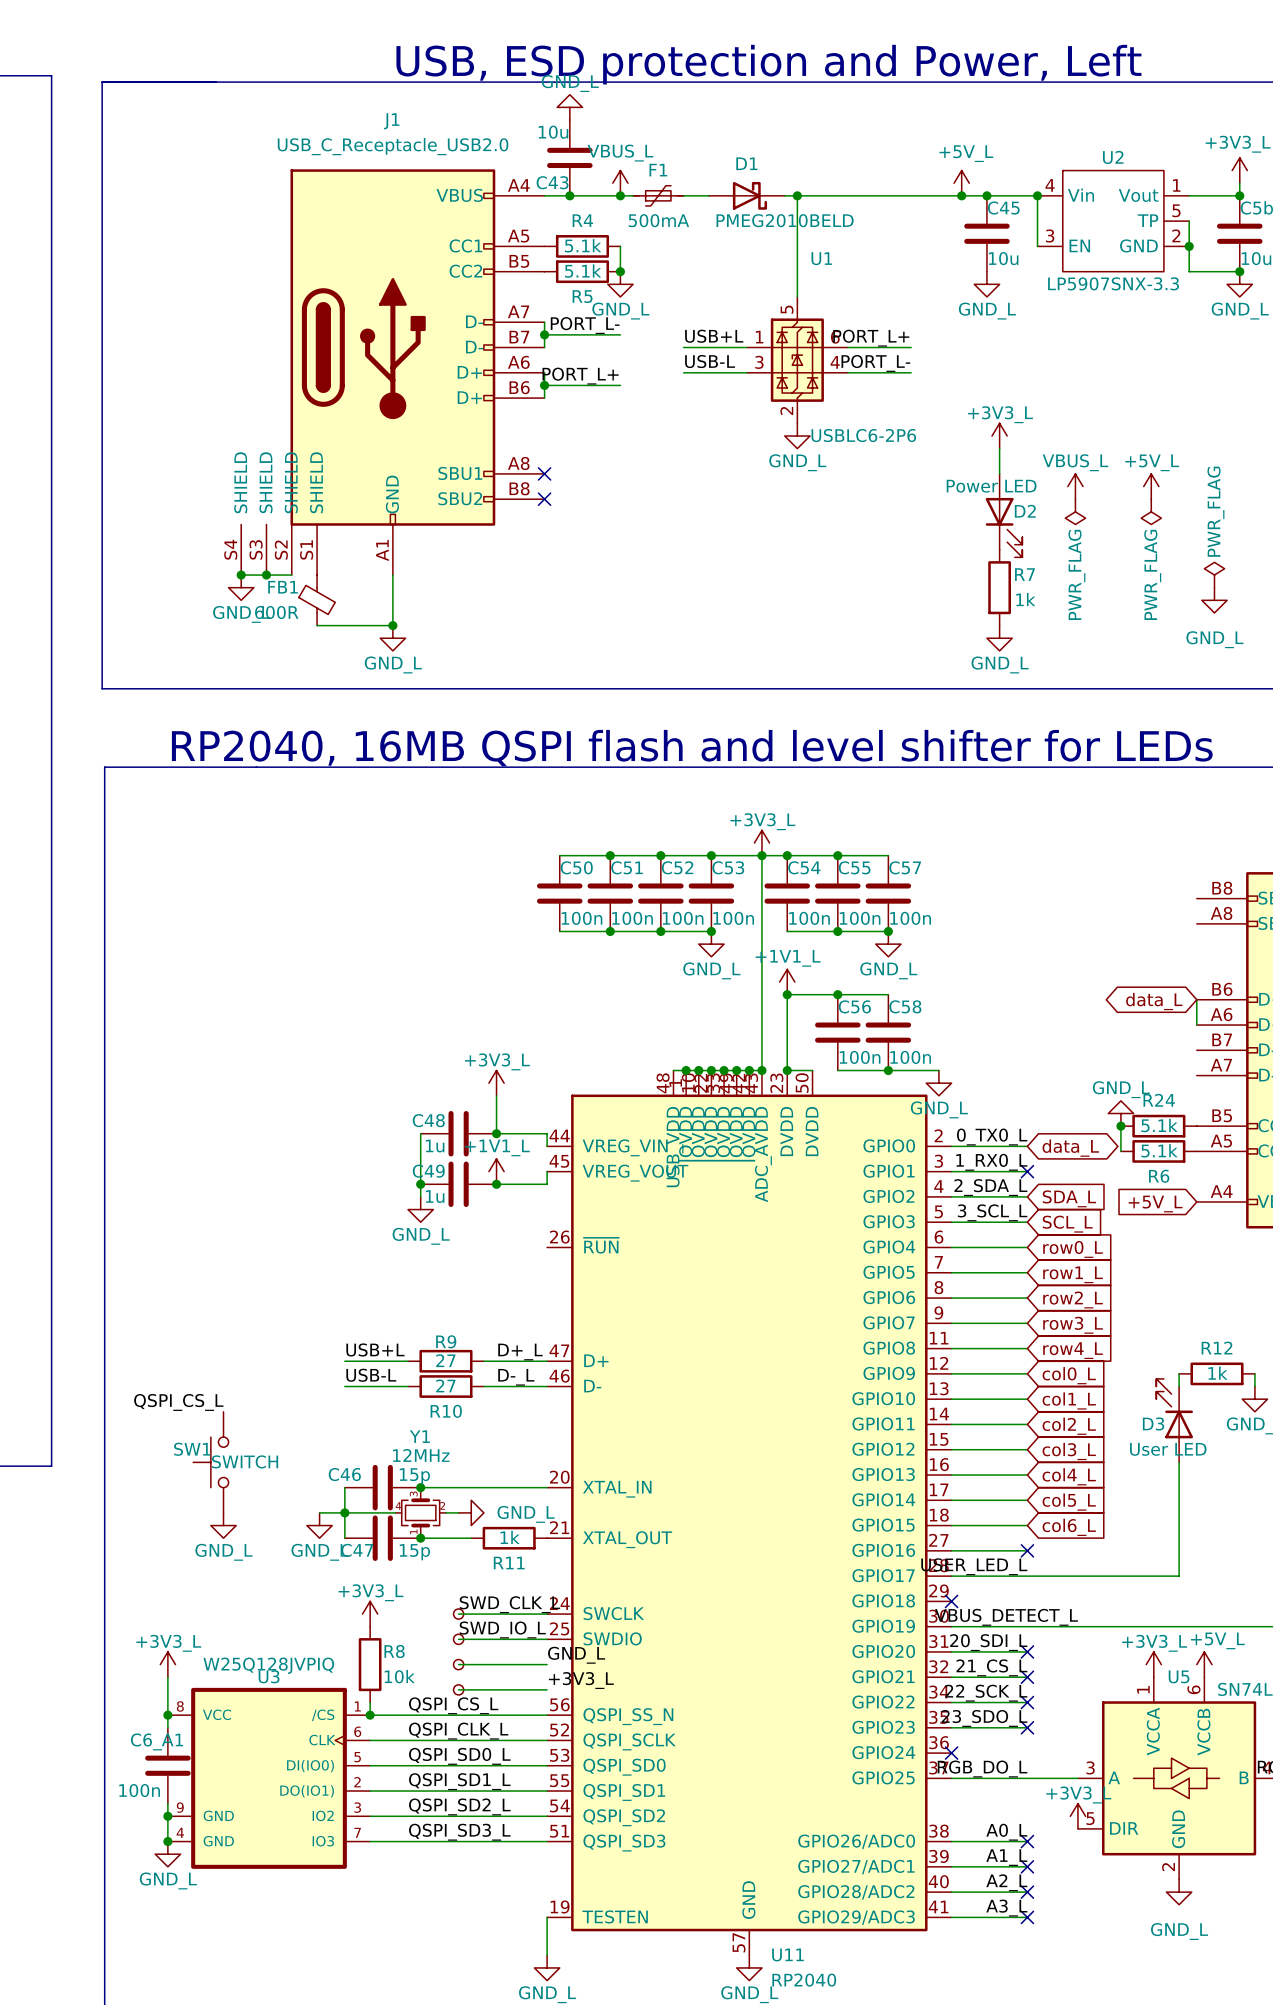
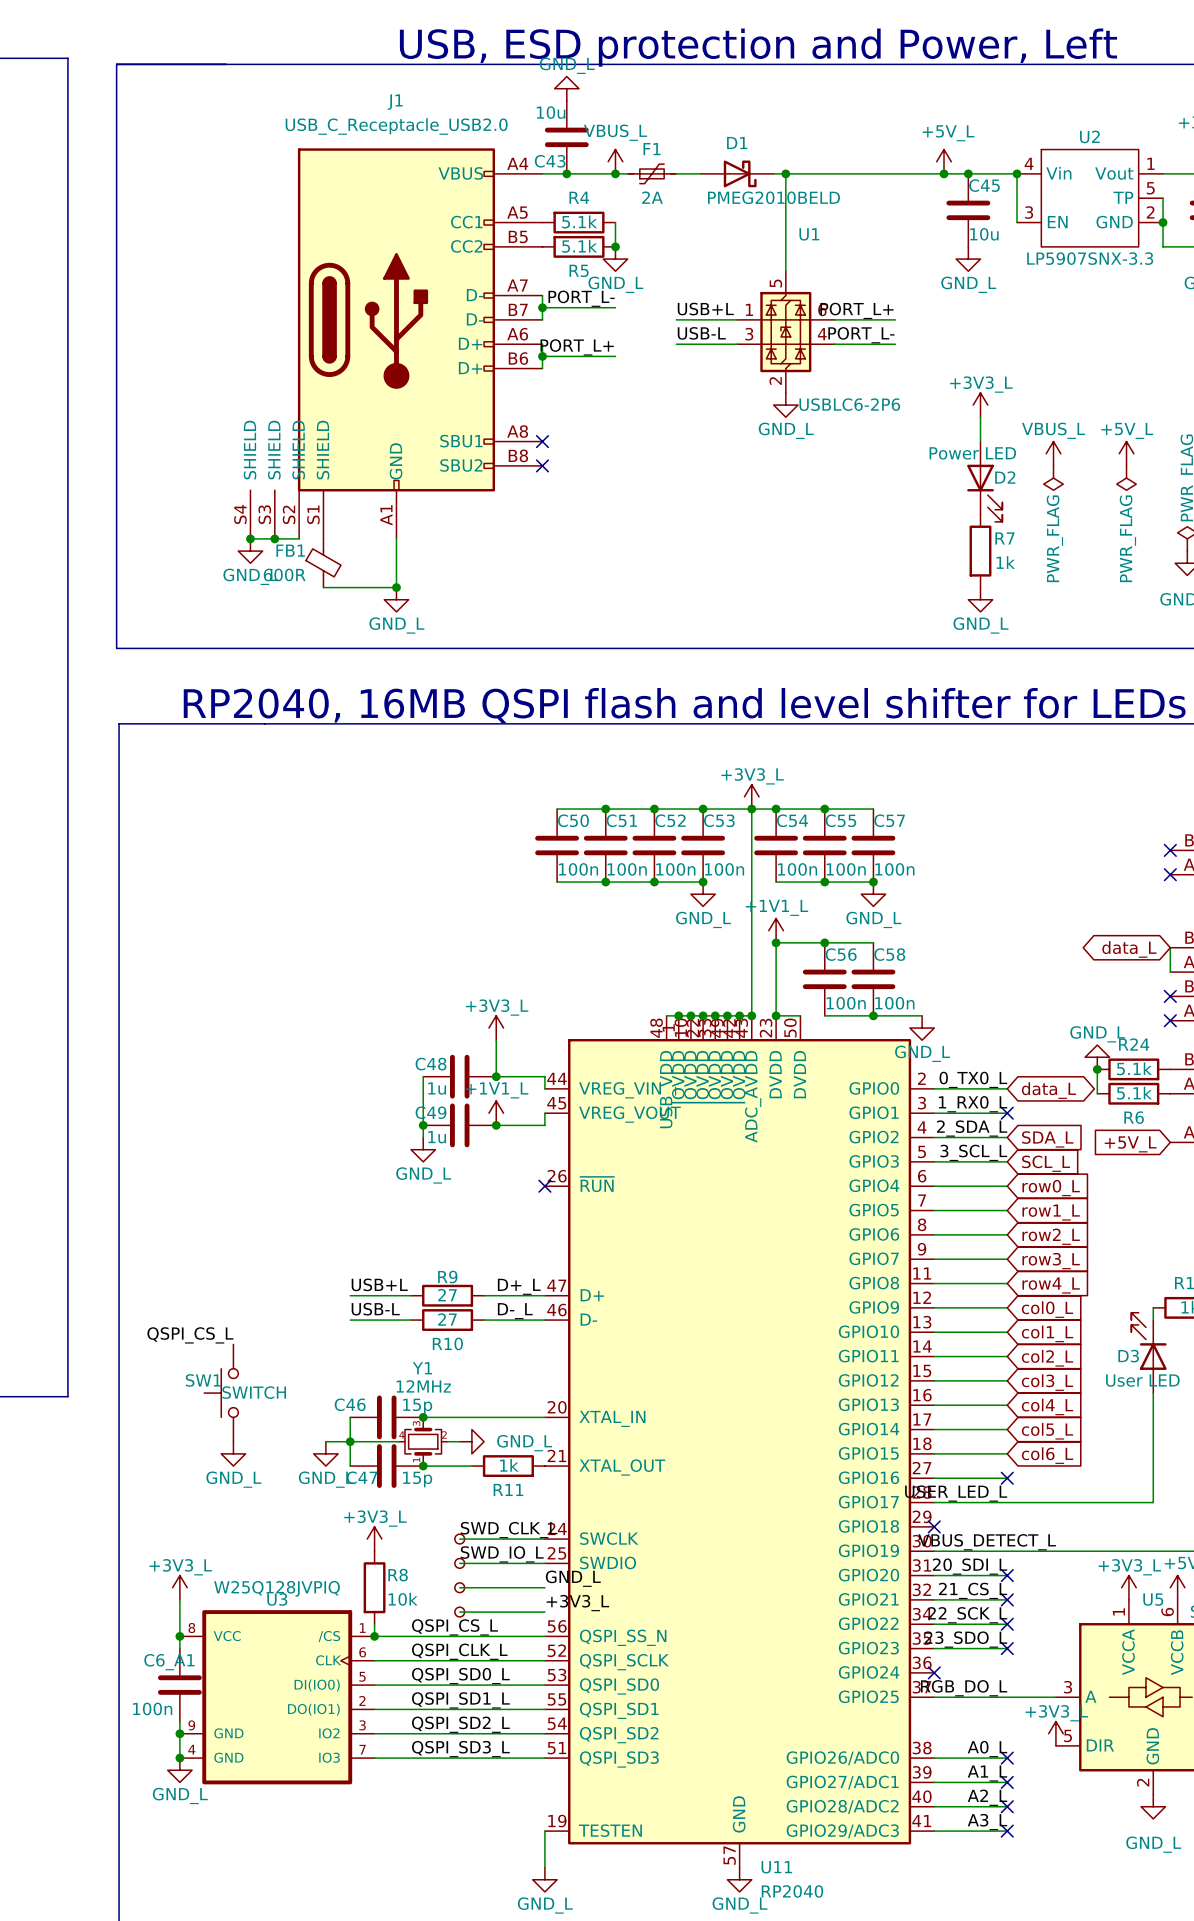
F1 value: 500mA (658, 220) -> 2A (652, 197)
no-connect mark: none -> (1170, 850)
no-connect mark: none -> (1170, 874)
no-connect mark: none -> (1170, 996)
no-connect mark: none -> (1170, 1020)
no-connect mark: none -> (544, 1186)

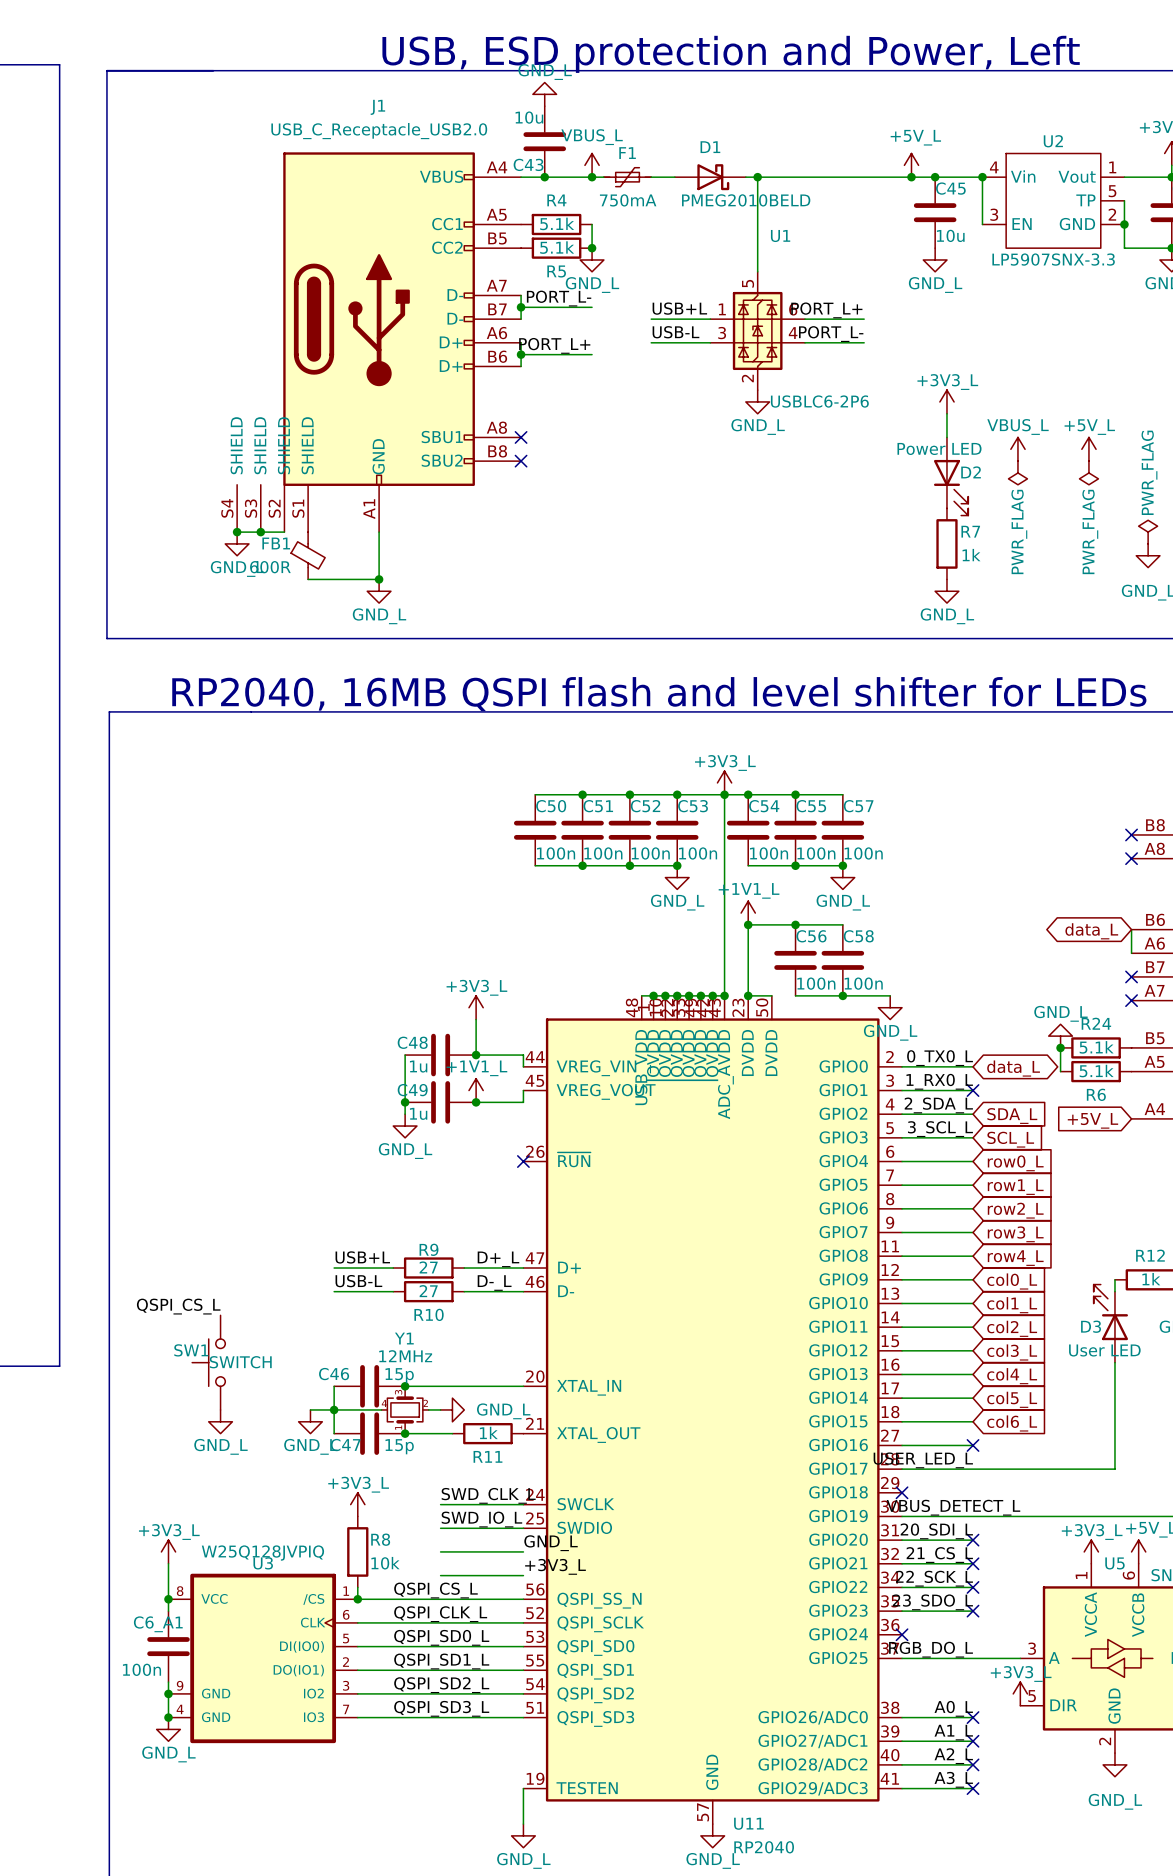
F1 value: 2A (652, 197) -> 750mA (628, 200)
part: (459, 1539) -> none
part: (459, 1563) -> none
part: (459, 1587) -> none
part: (459, 1612) -> none

